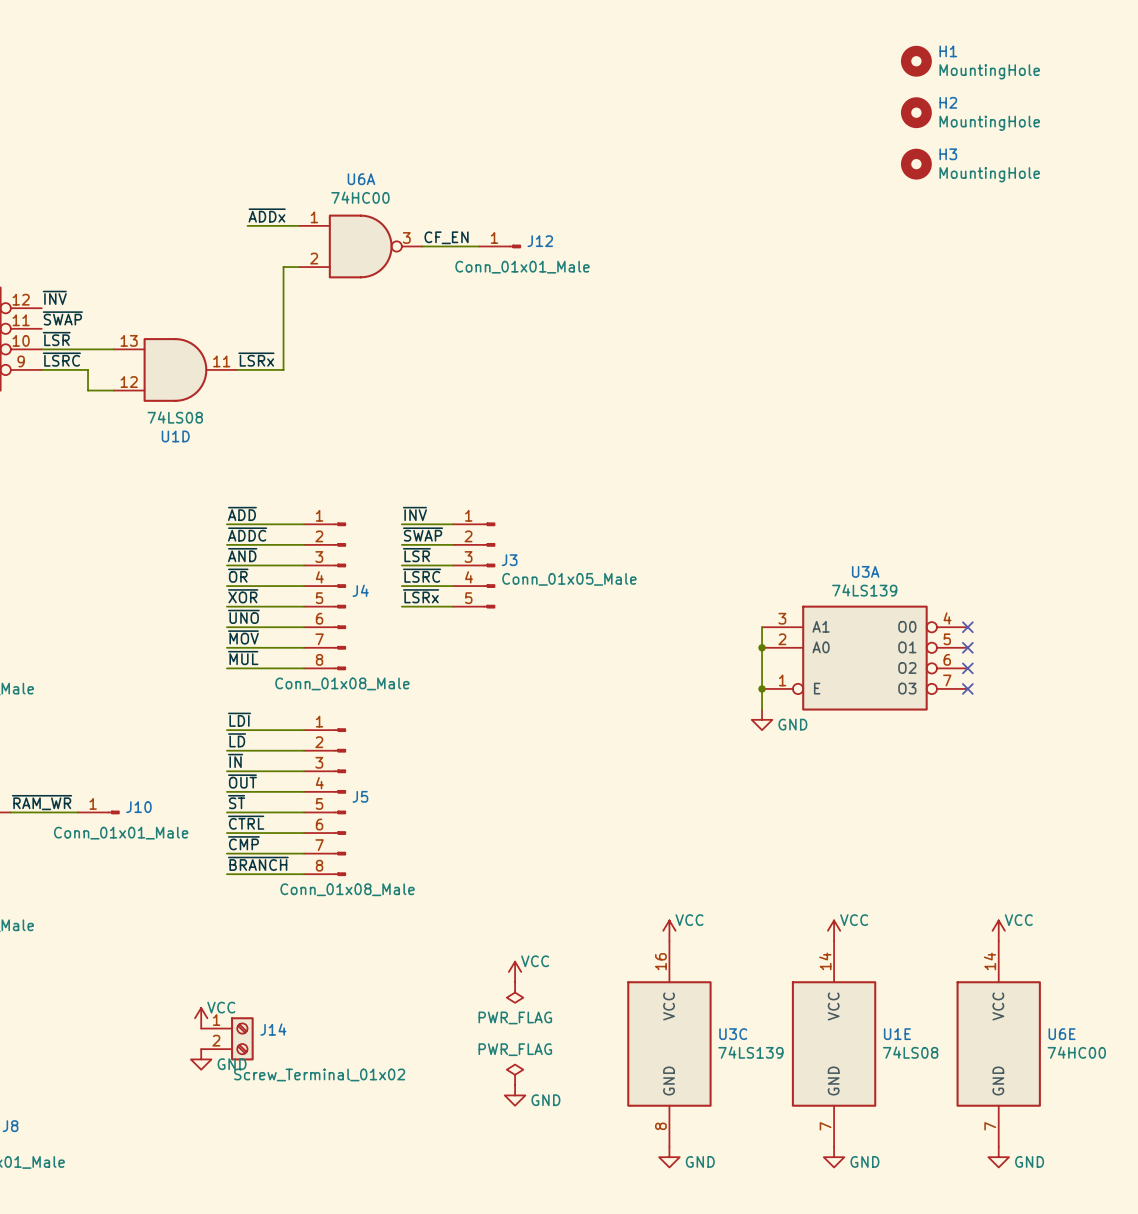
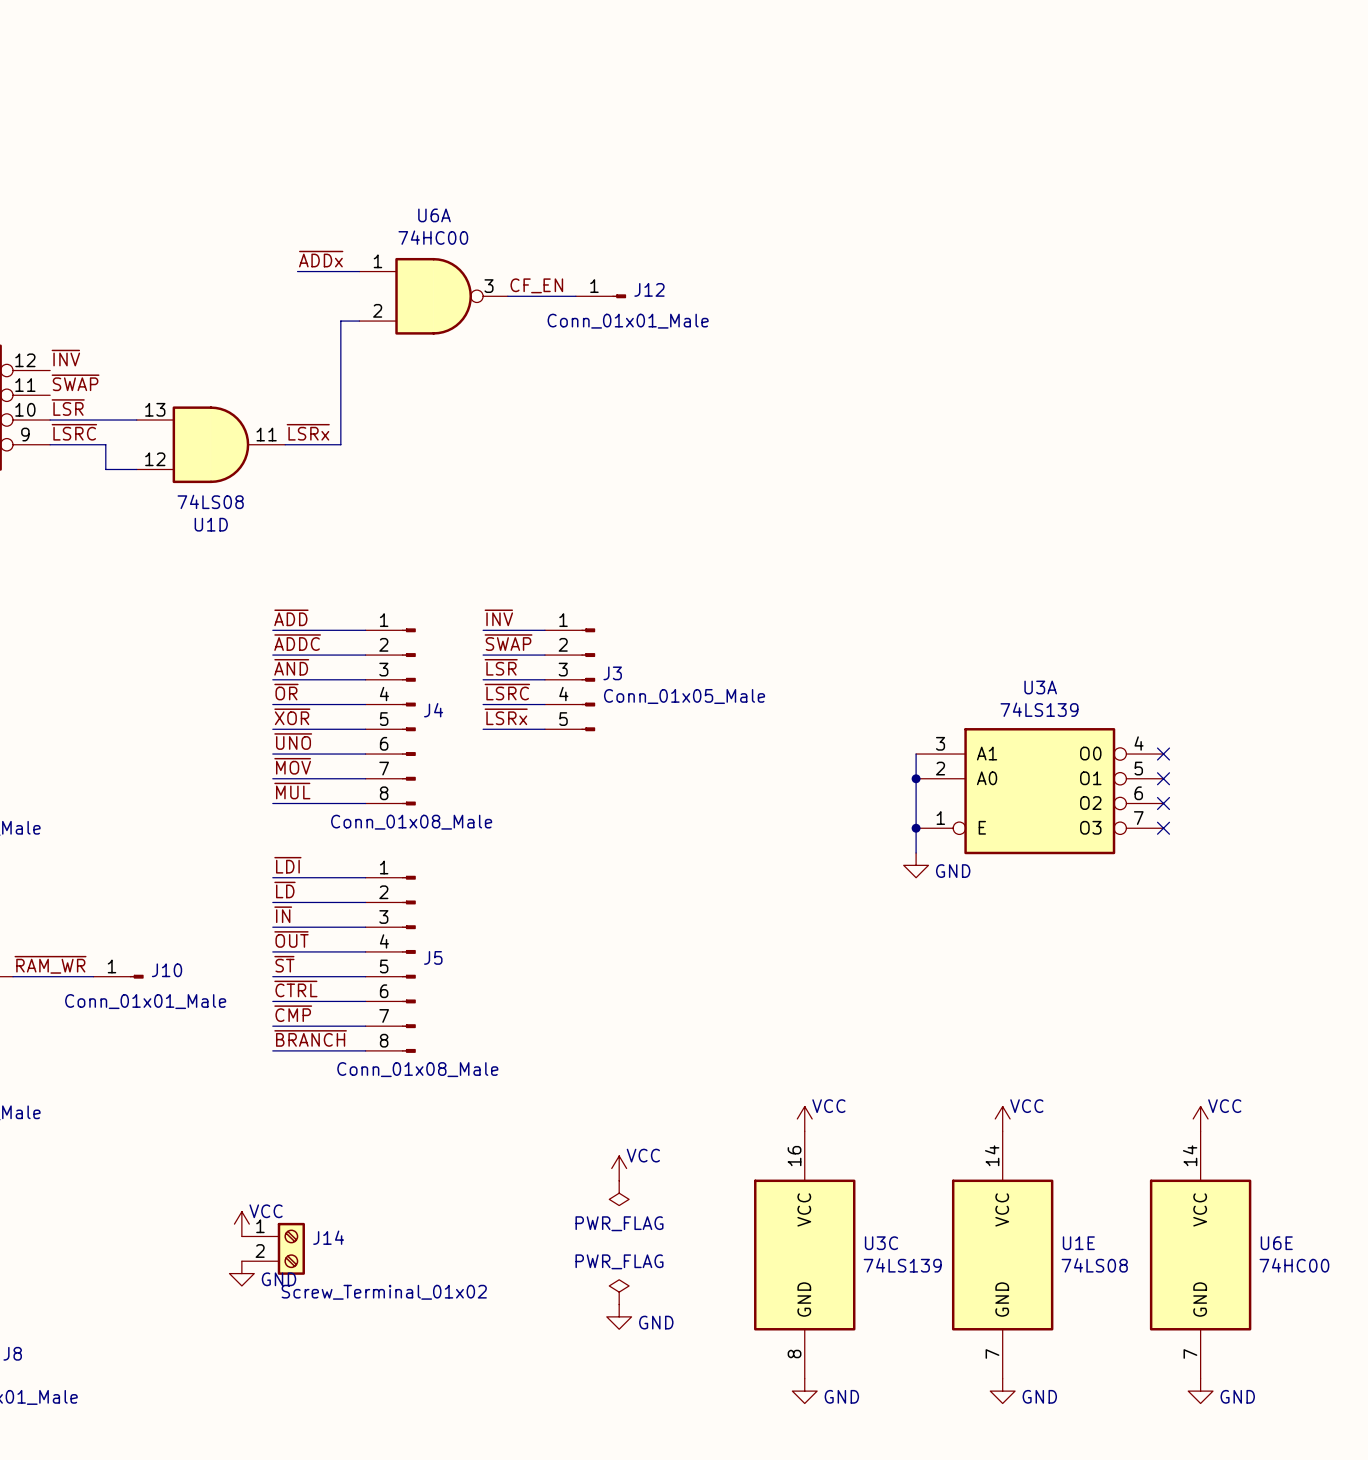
H1: MountingHole (916, 61) -> none
H2: MountingHole (916, 112) -> none
H3: MountingHole (916, 164) -> none

